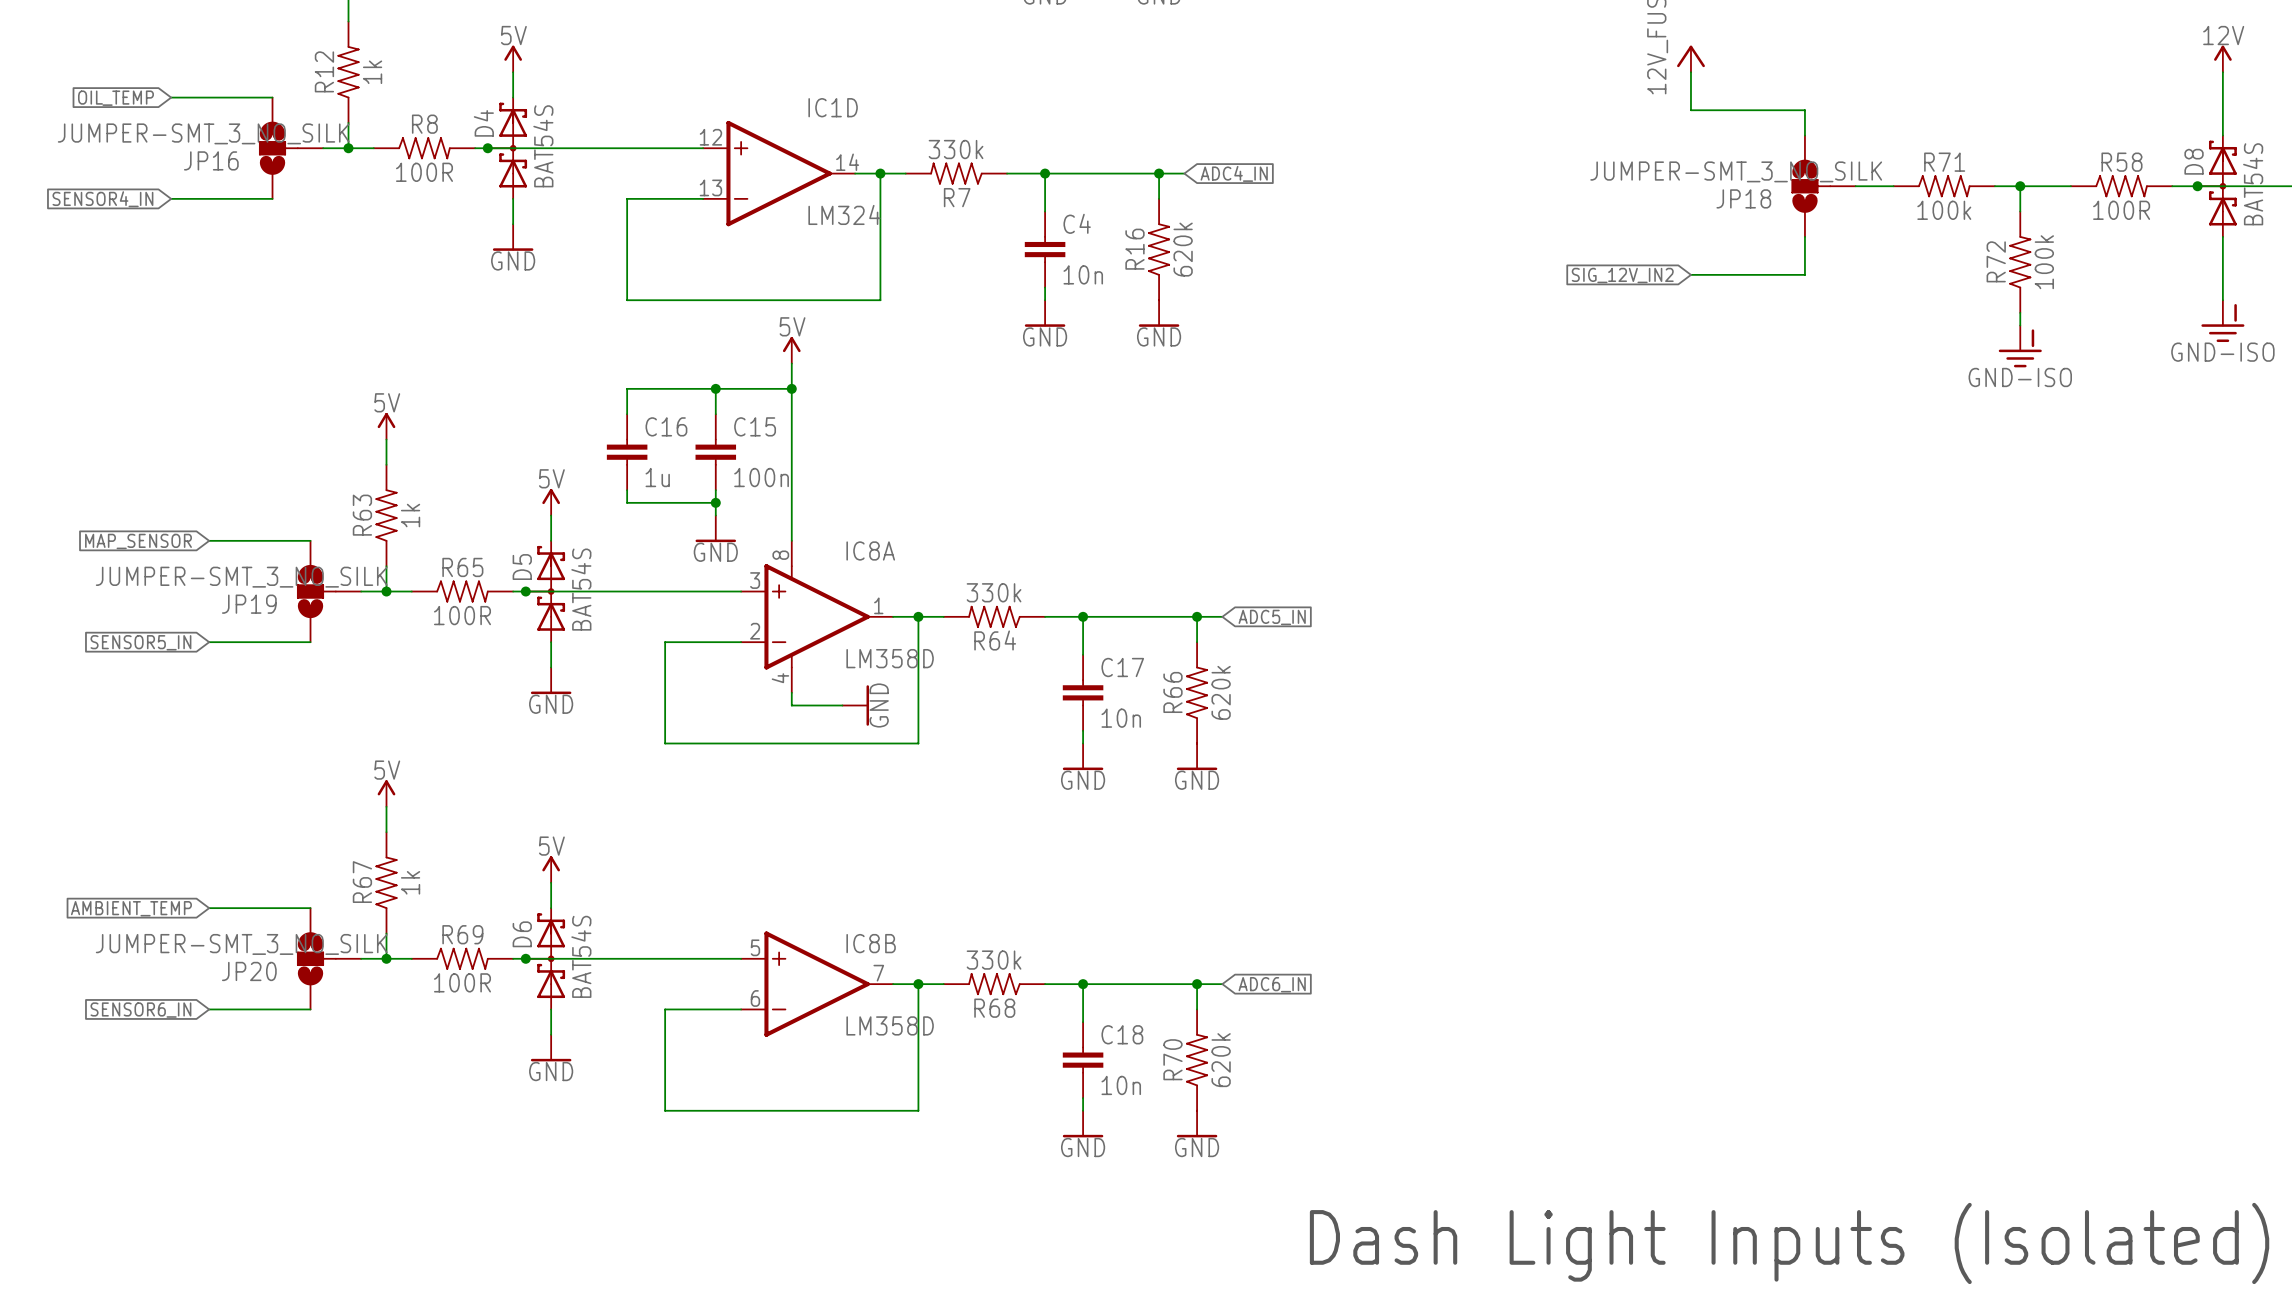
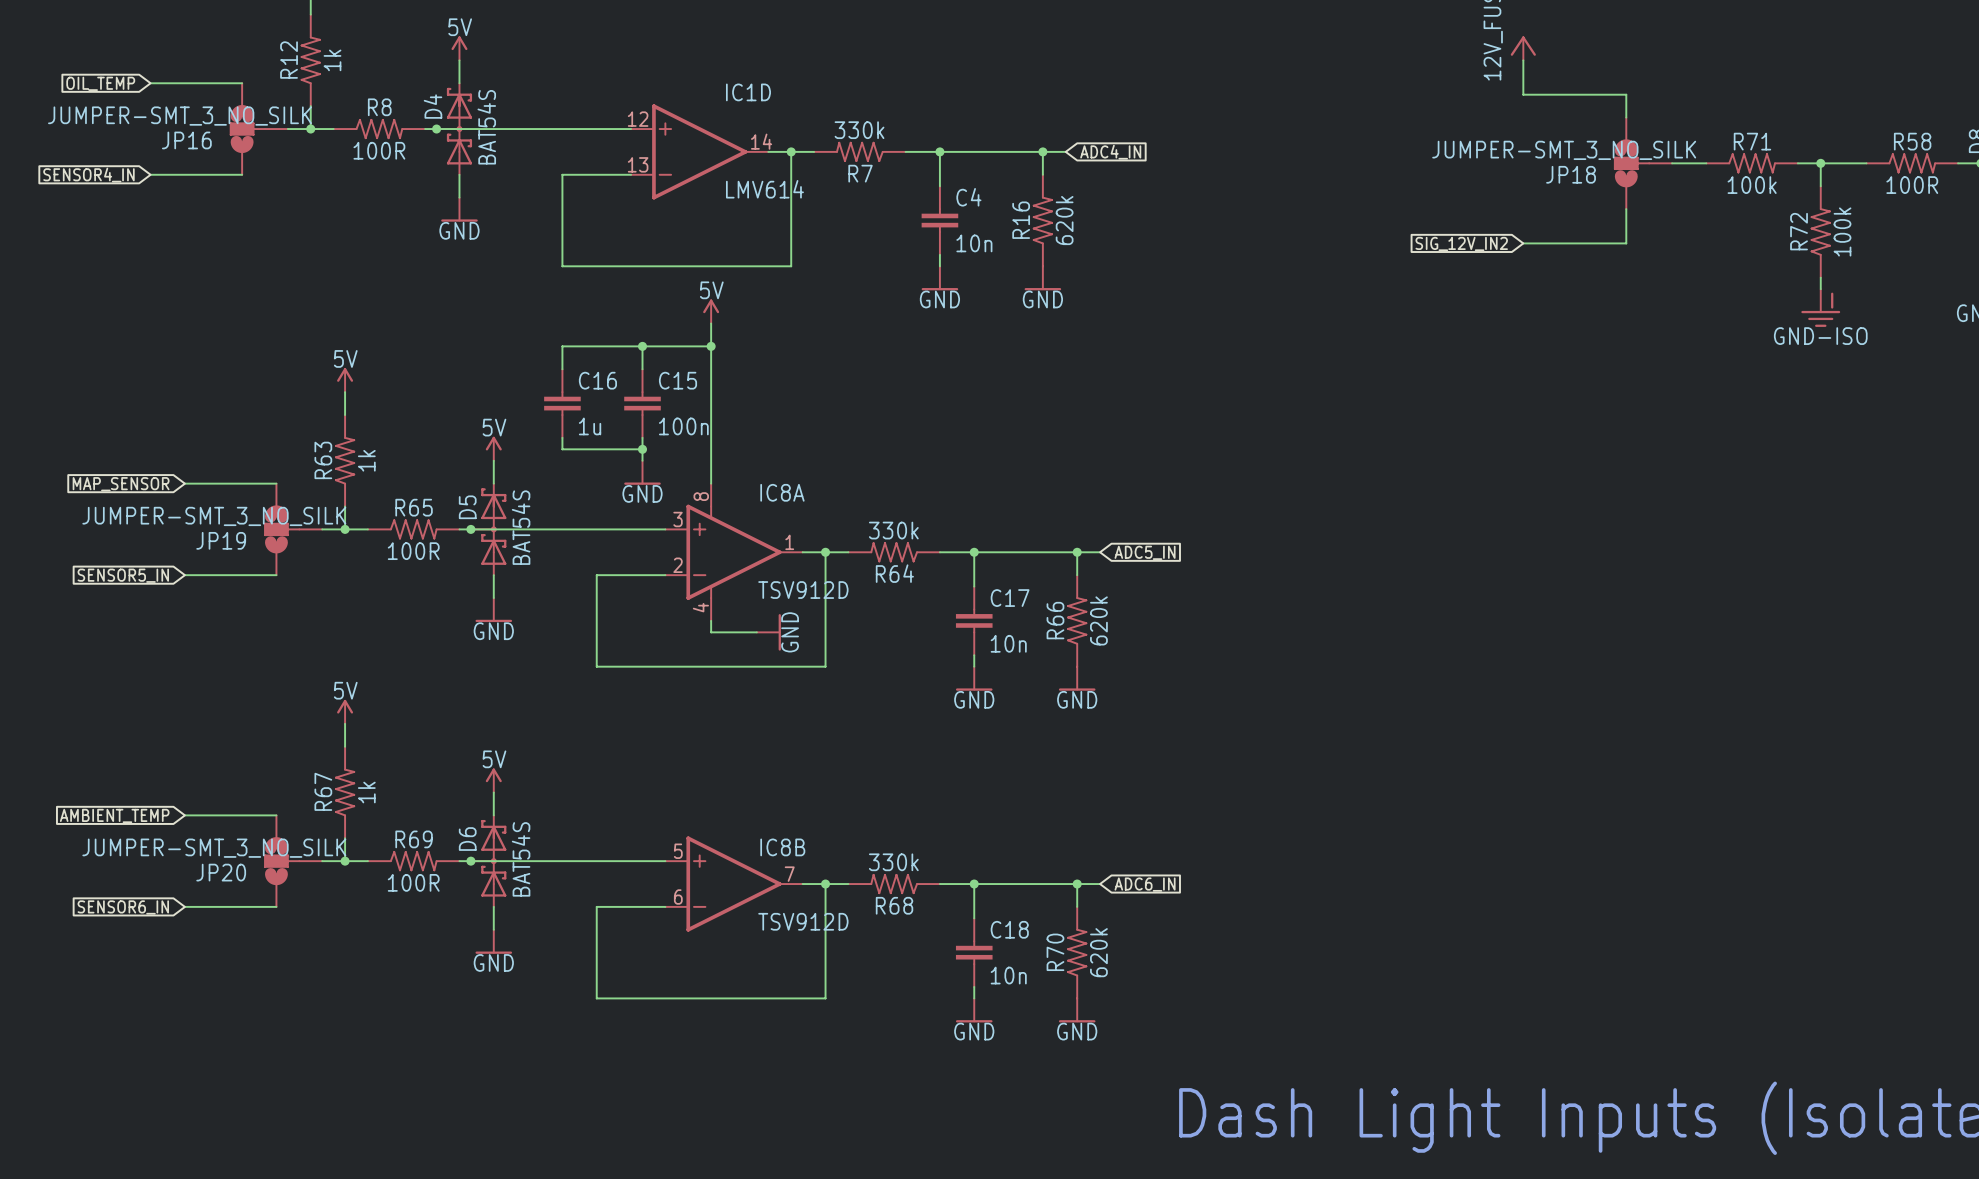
IC1D value: LM324 (844, 214) -> LMV614 (764, 189)
IC8A value: LM358D (890, 658) -> TSV912D (803, 590)
IC8B value: LM358D (890, 1025) -> TSV912D (803, 921)

